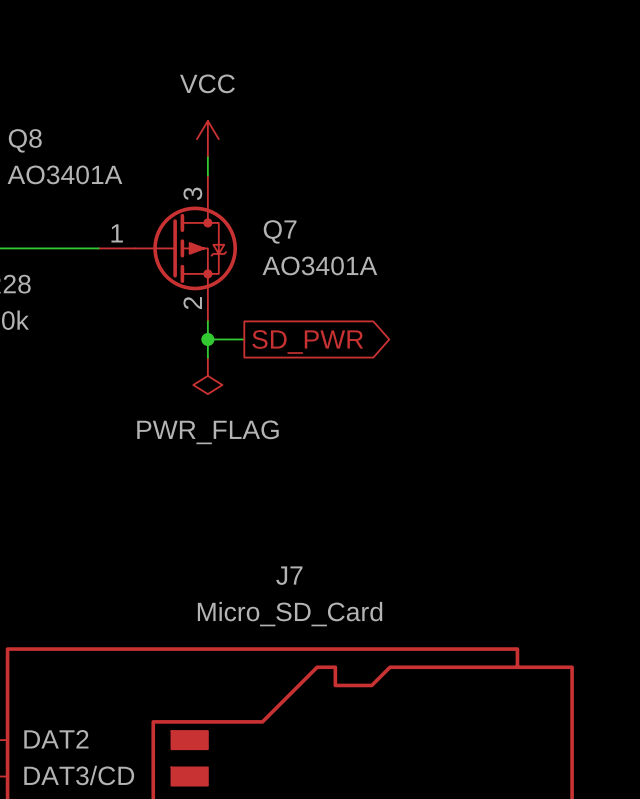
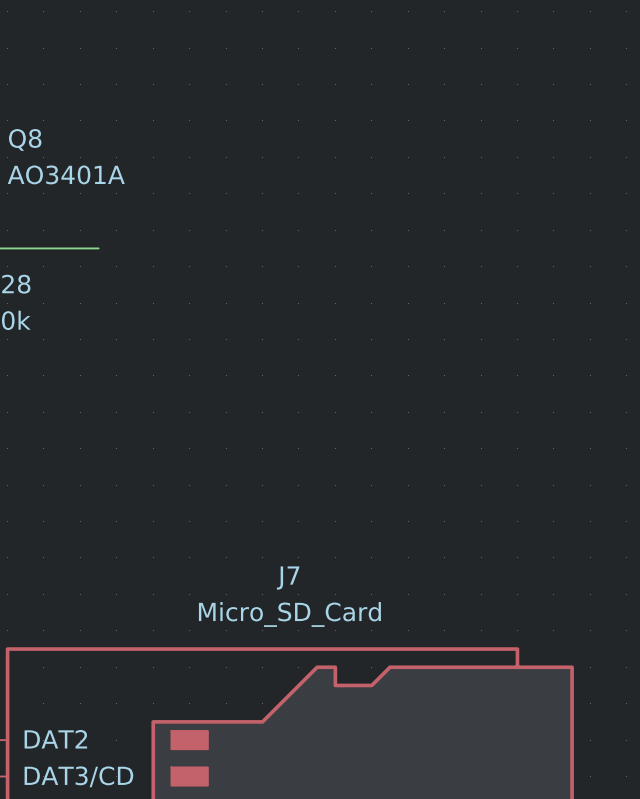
power symbol: VCC (207, 139) -> none
wire: (207, 157) (207, 175) -> none
Q7: AO3401A (167, 248) -> none
wire: (207, 321) (207, 357) -> none
wire: (207, 339) (244, 339) -> none
junction: (207, 339) -> none
global label: SD_PWR (307, 341) -> none
power symbol: PWR_FLAG (207, 375) -> none

